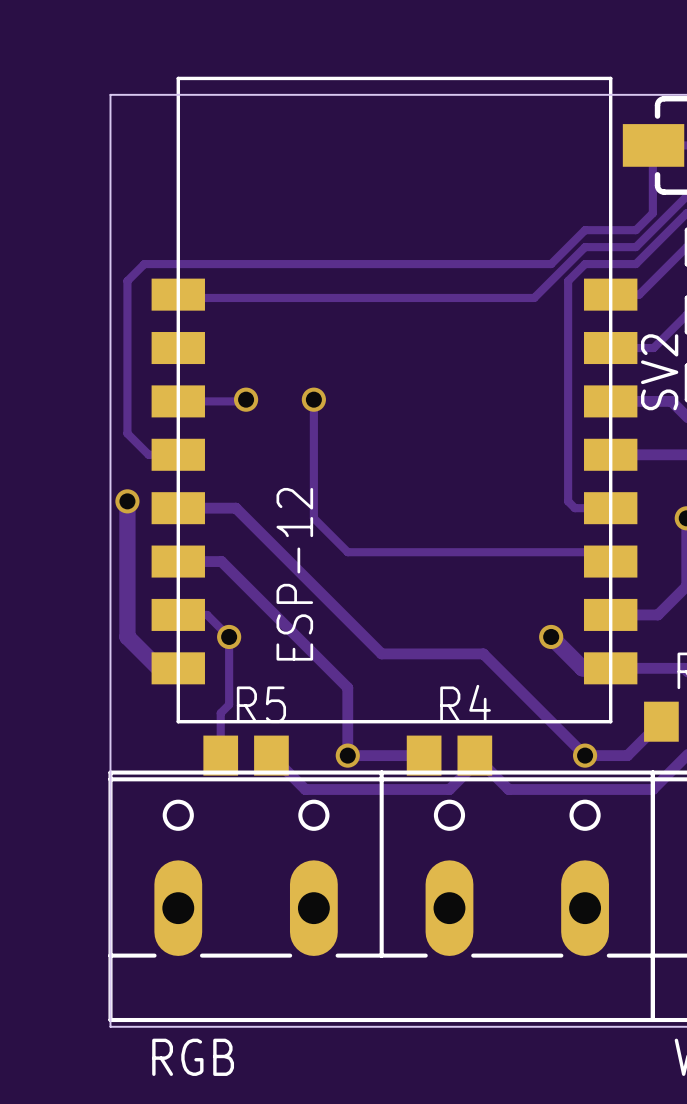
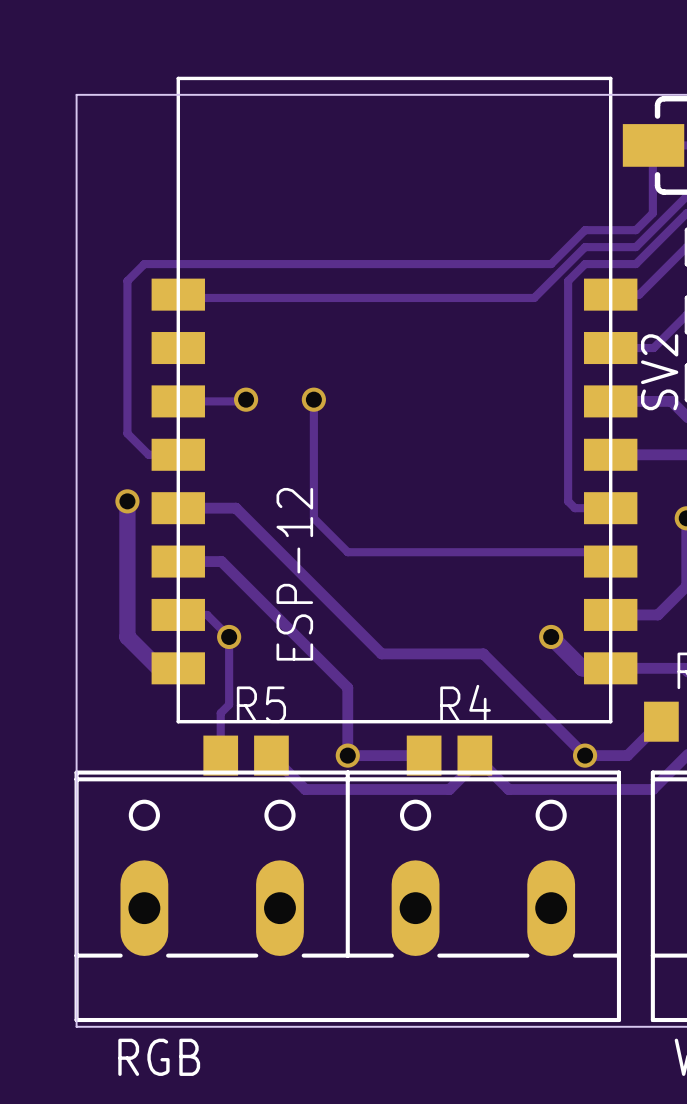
board edge: (110, 94) (110, 1026) -> (110, 94) (76, 94) (76, 1026) (110, 1026)
RGB position: (381, 896) -> (347, 896)

